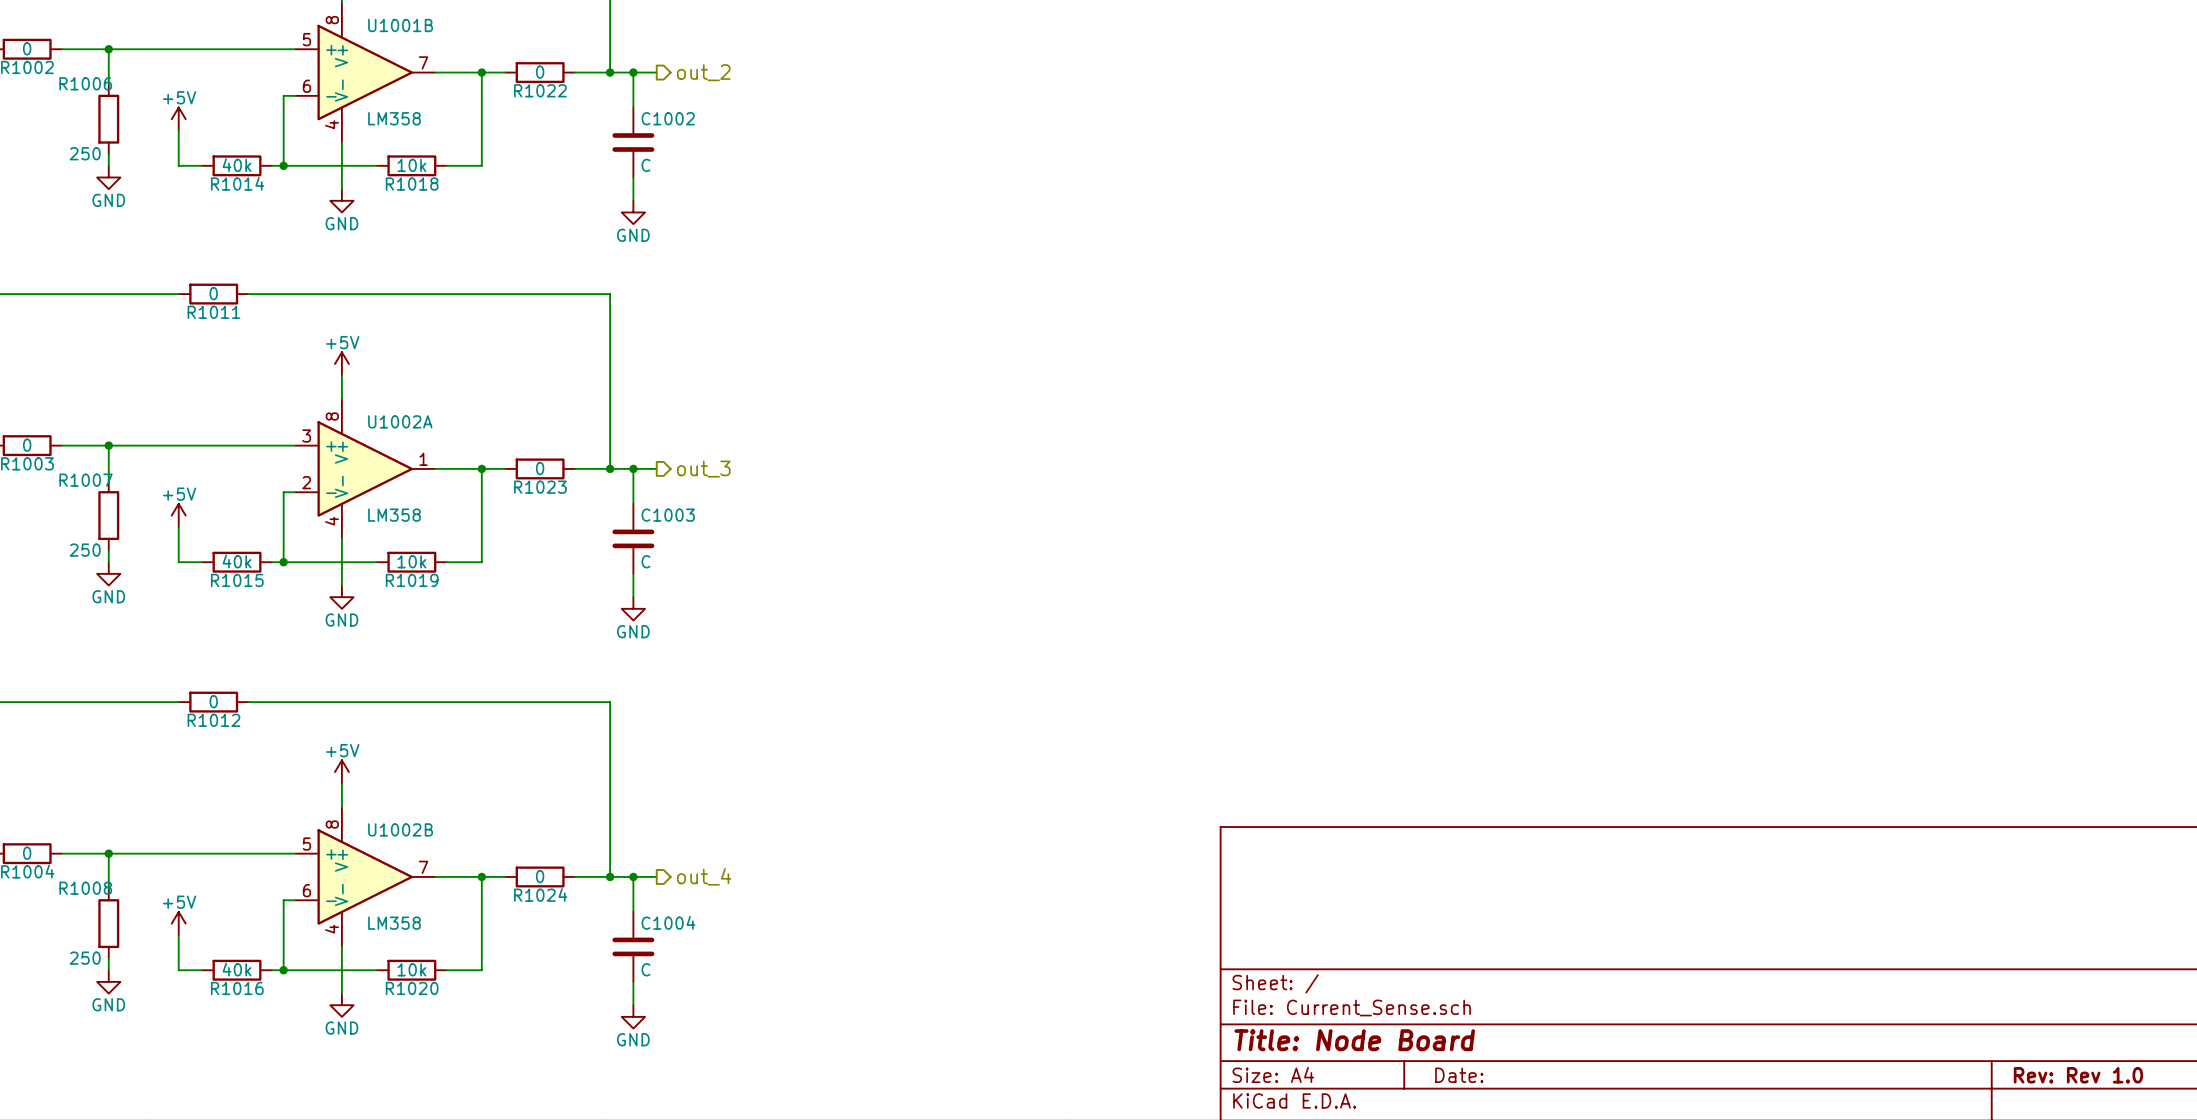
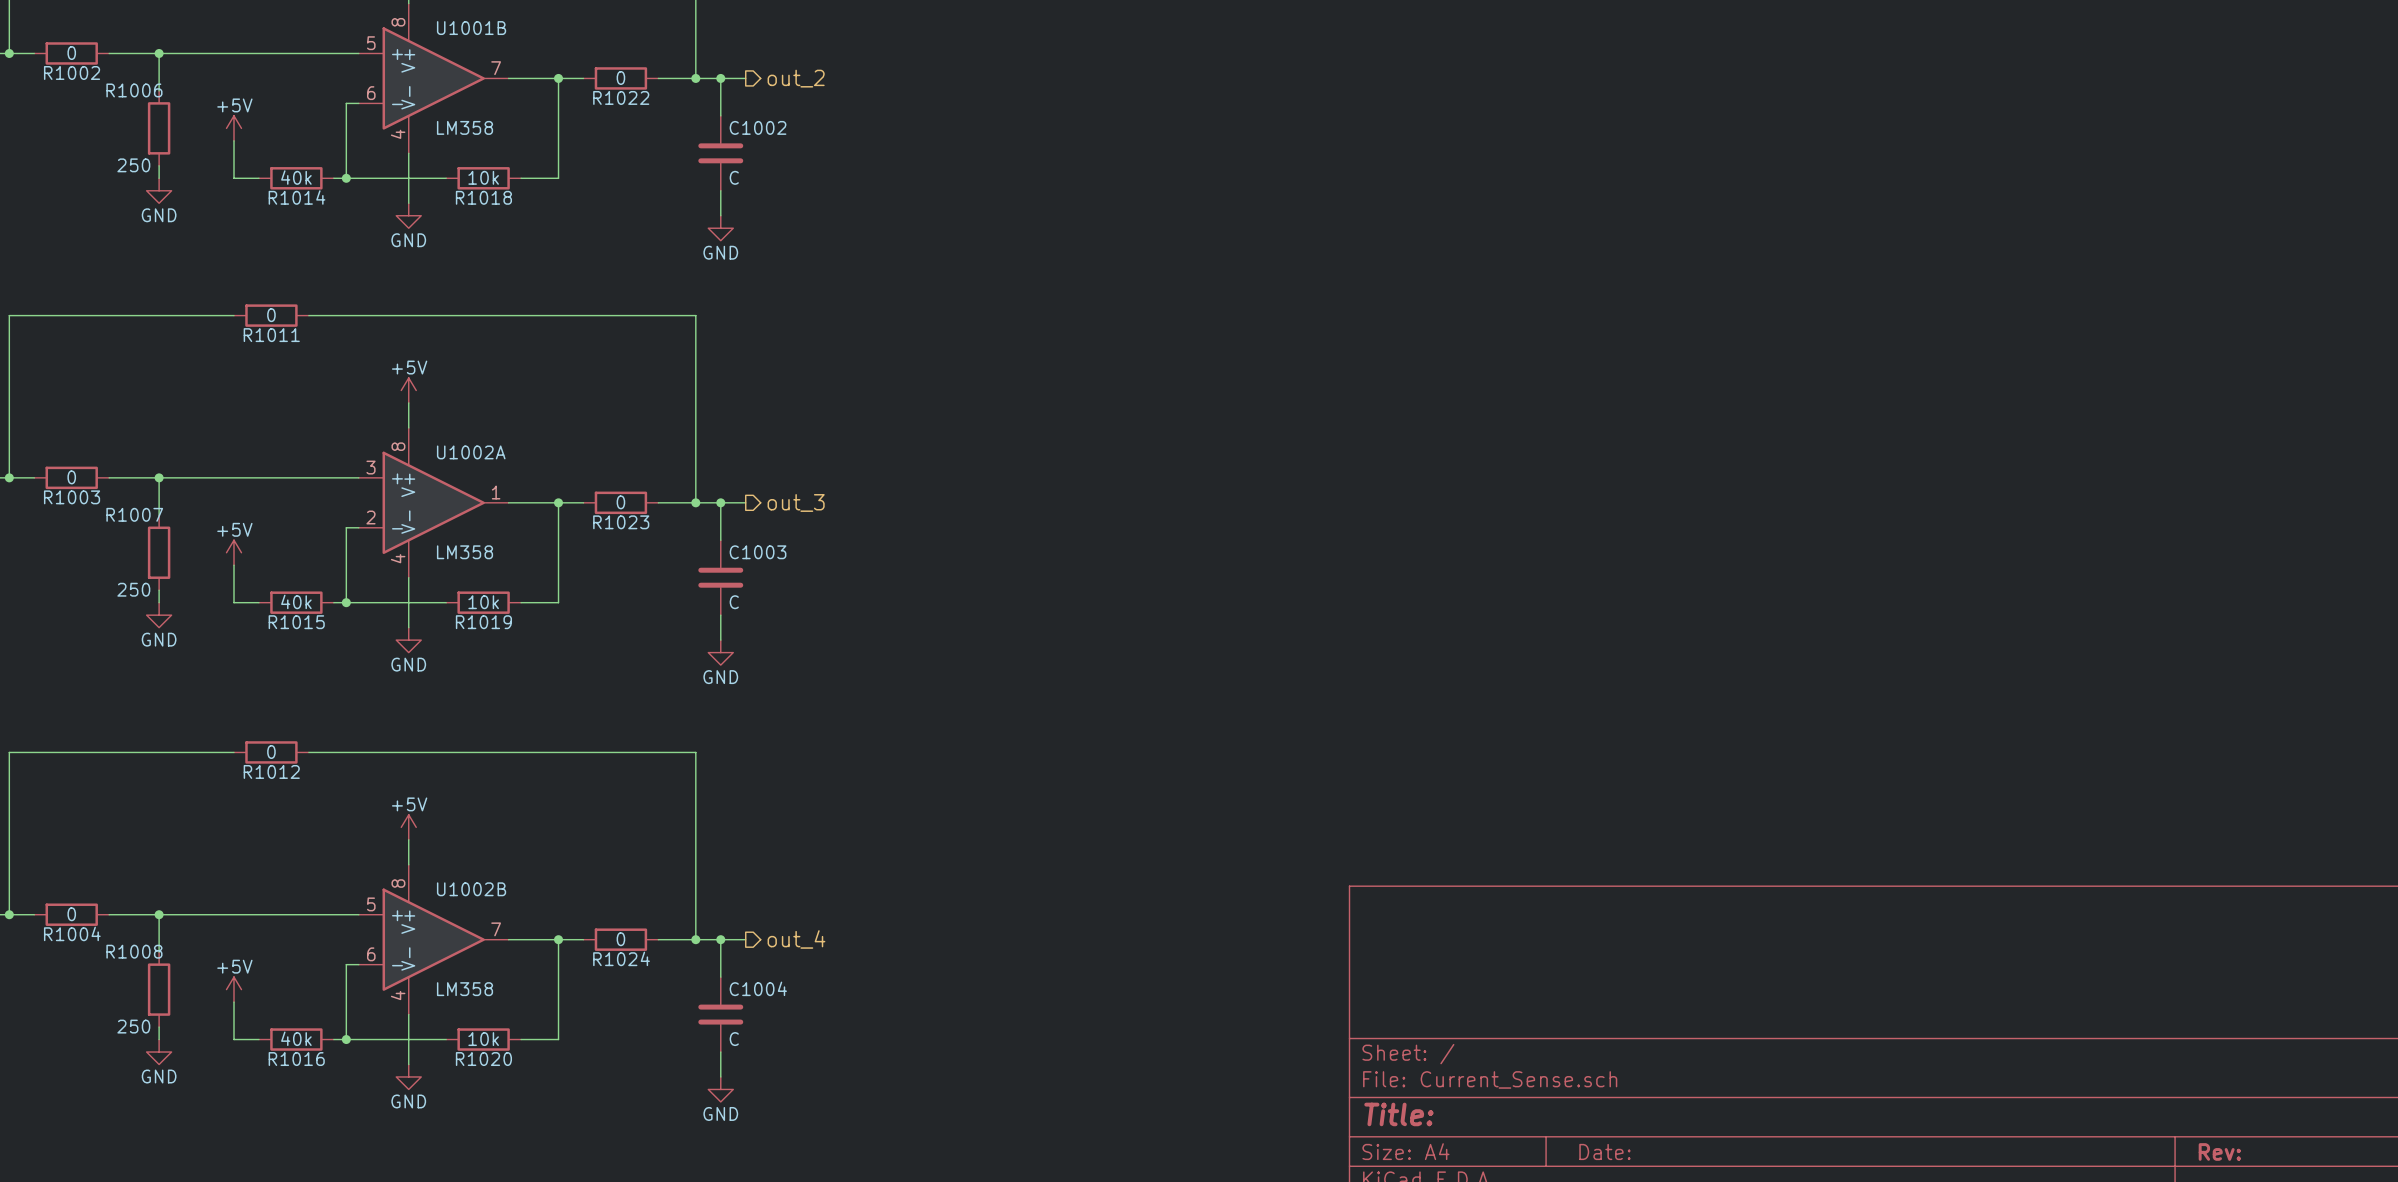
title block: Title: Node Board (1354, 1040) -> Title: (1398, 1114)
title block: Rev: Rev 1.0 (2078, 1075) -> Rev: (2219, 1151)

